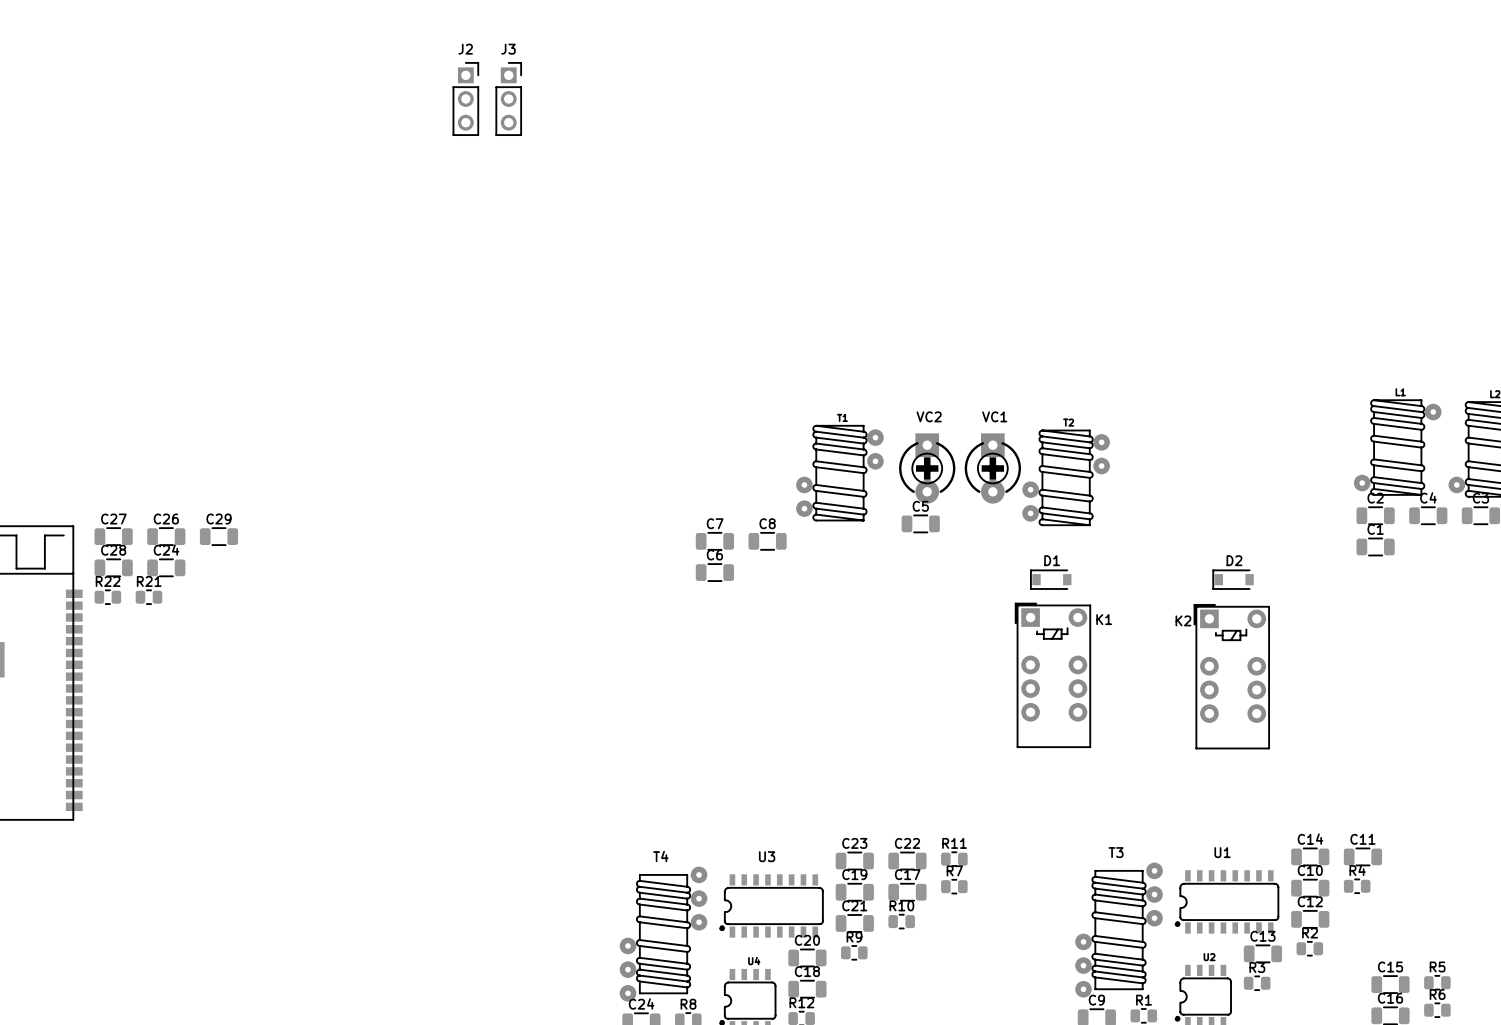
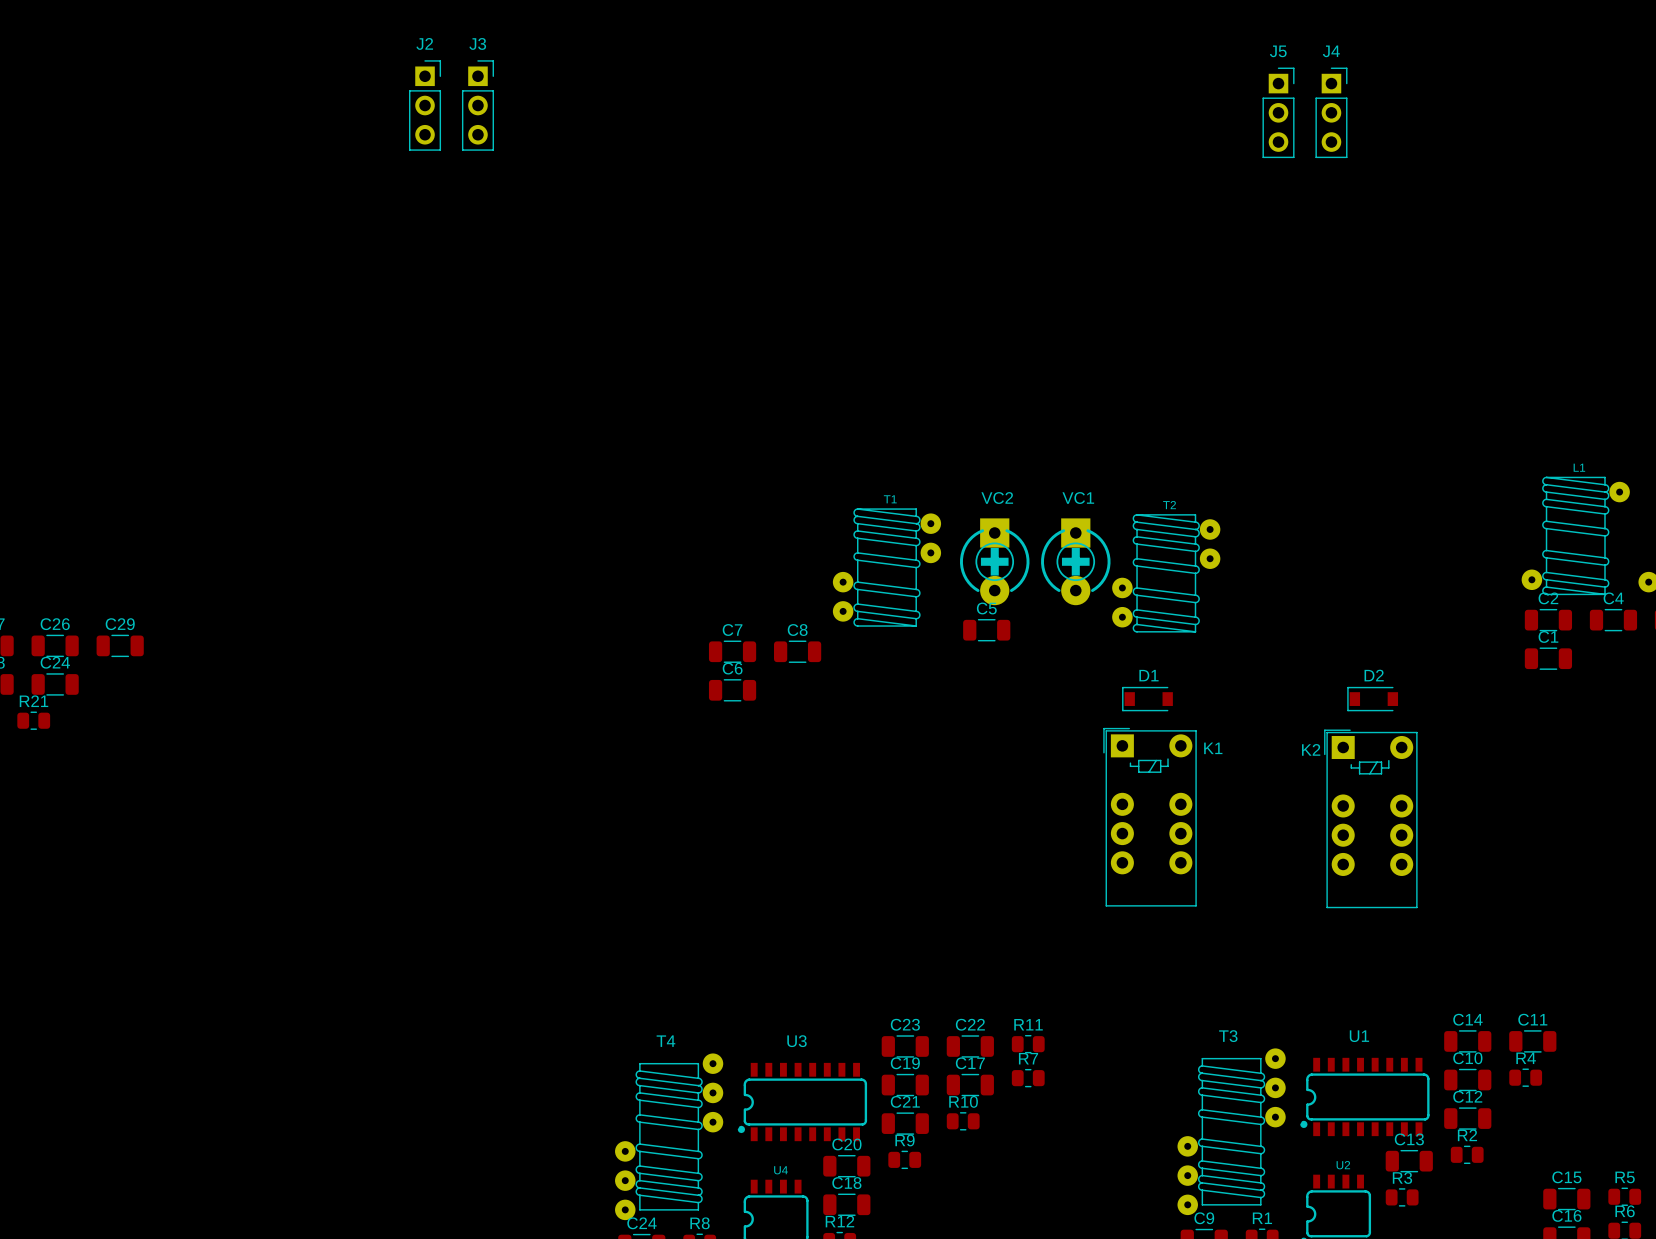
J5: none -> (1278, 112)
J4: none -> (1331, 112)

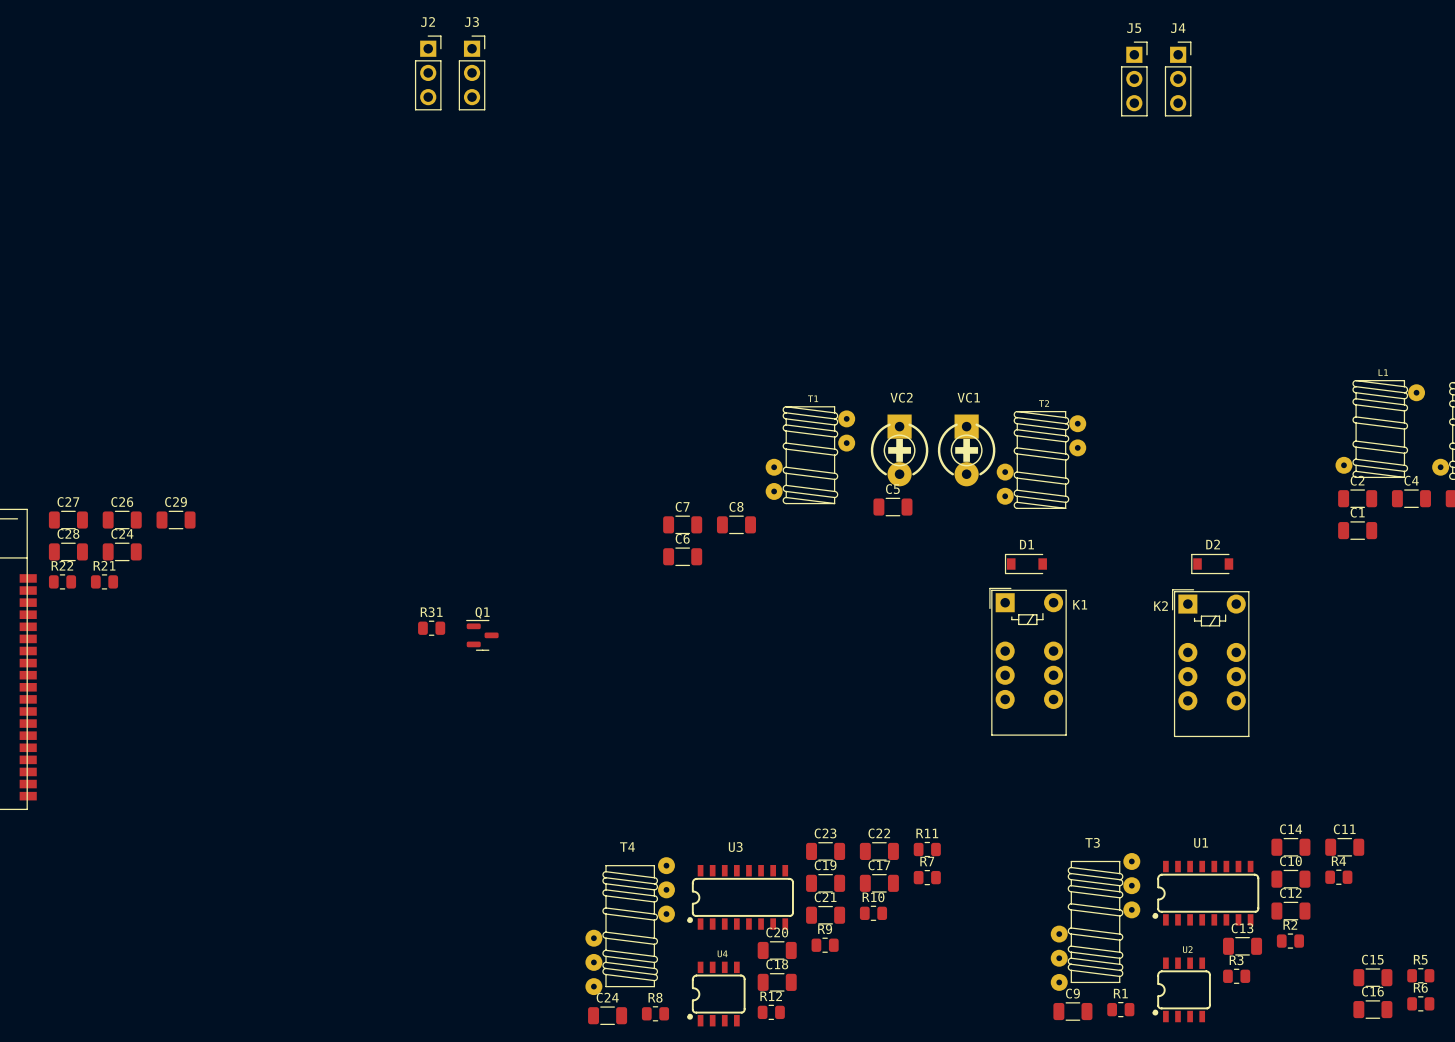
R31: none -> (431, 628)
Q1: none -> (482, 635)

